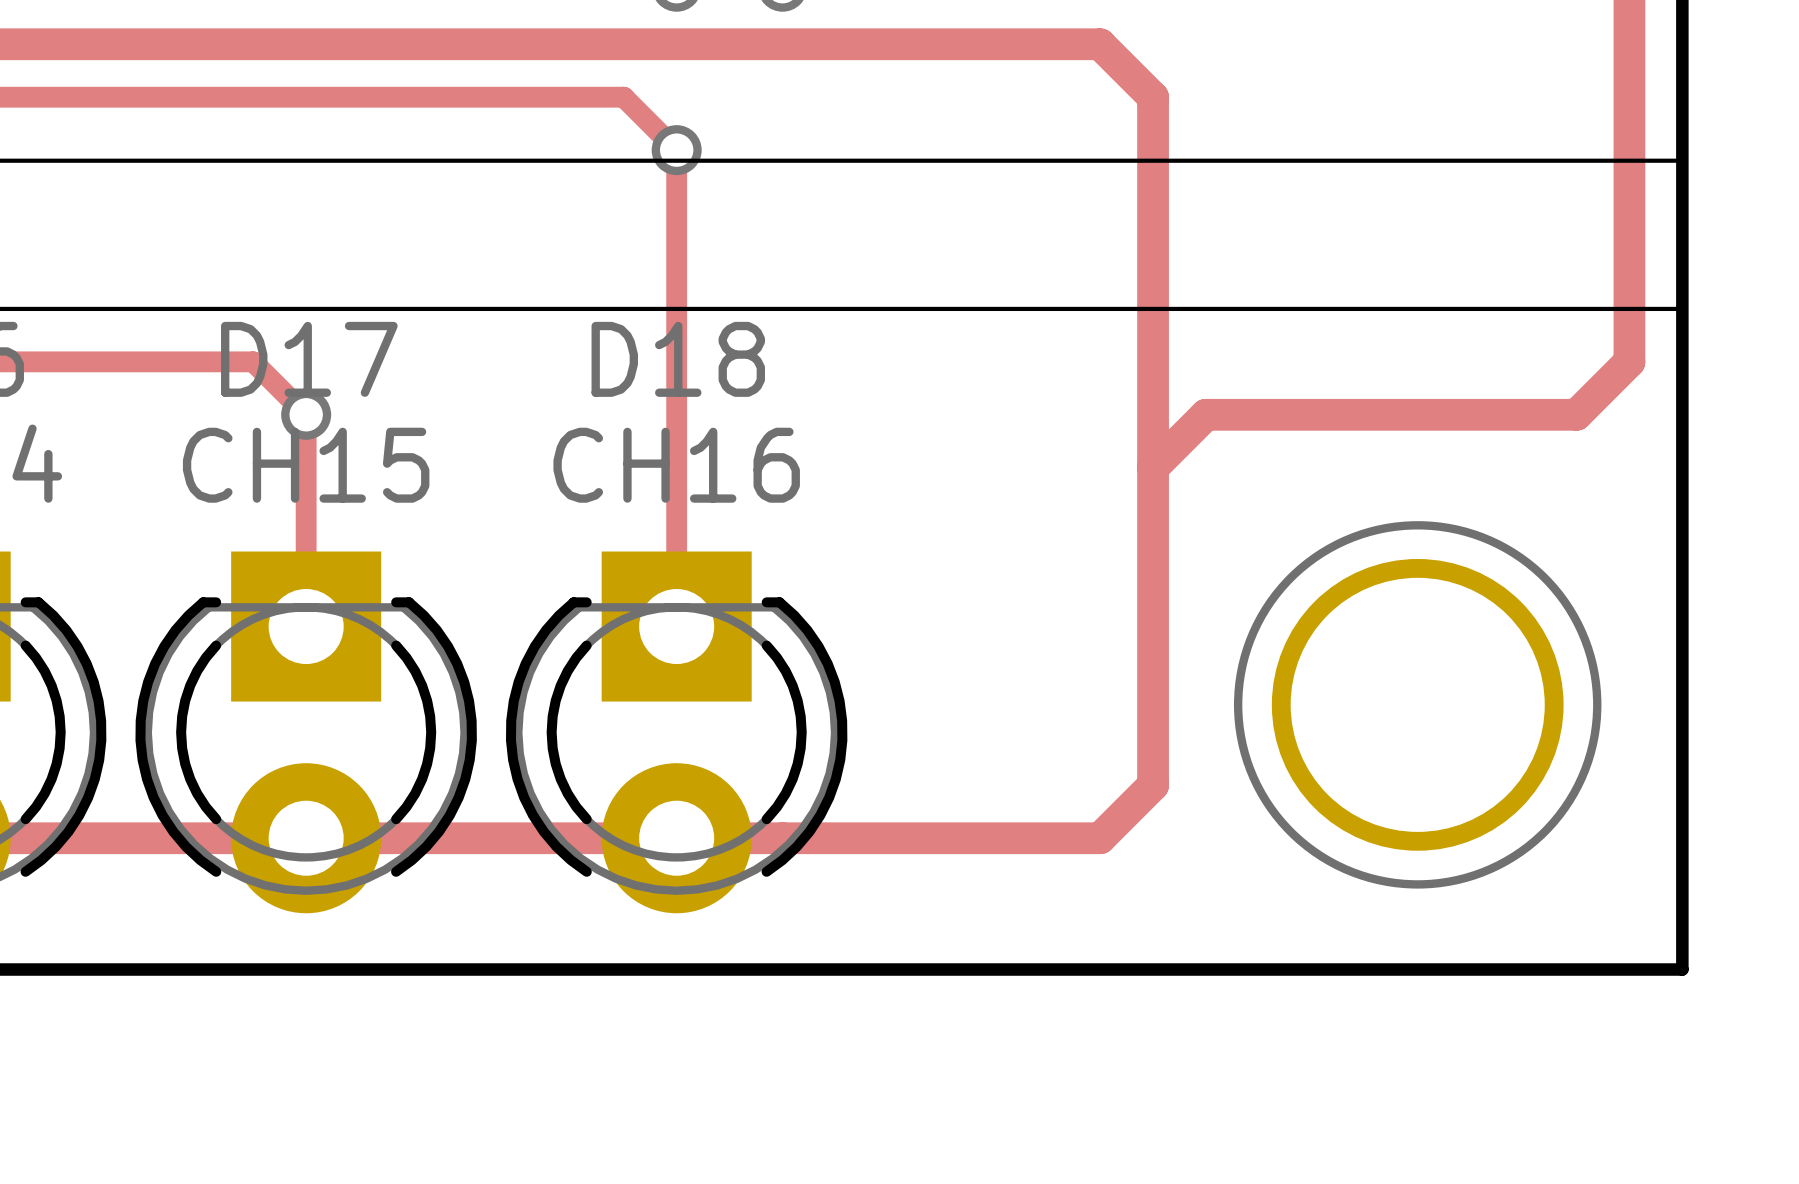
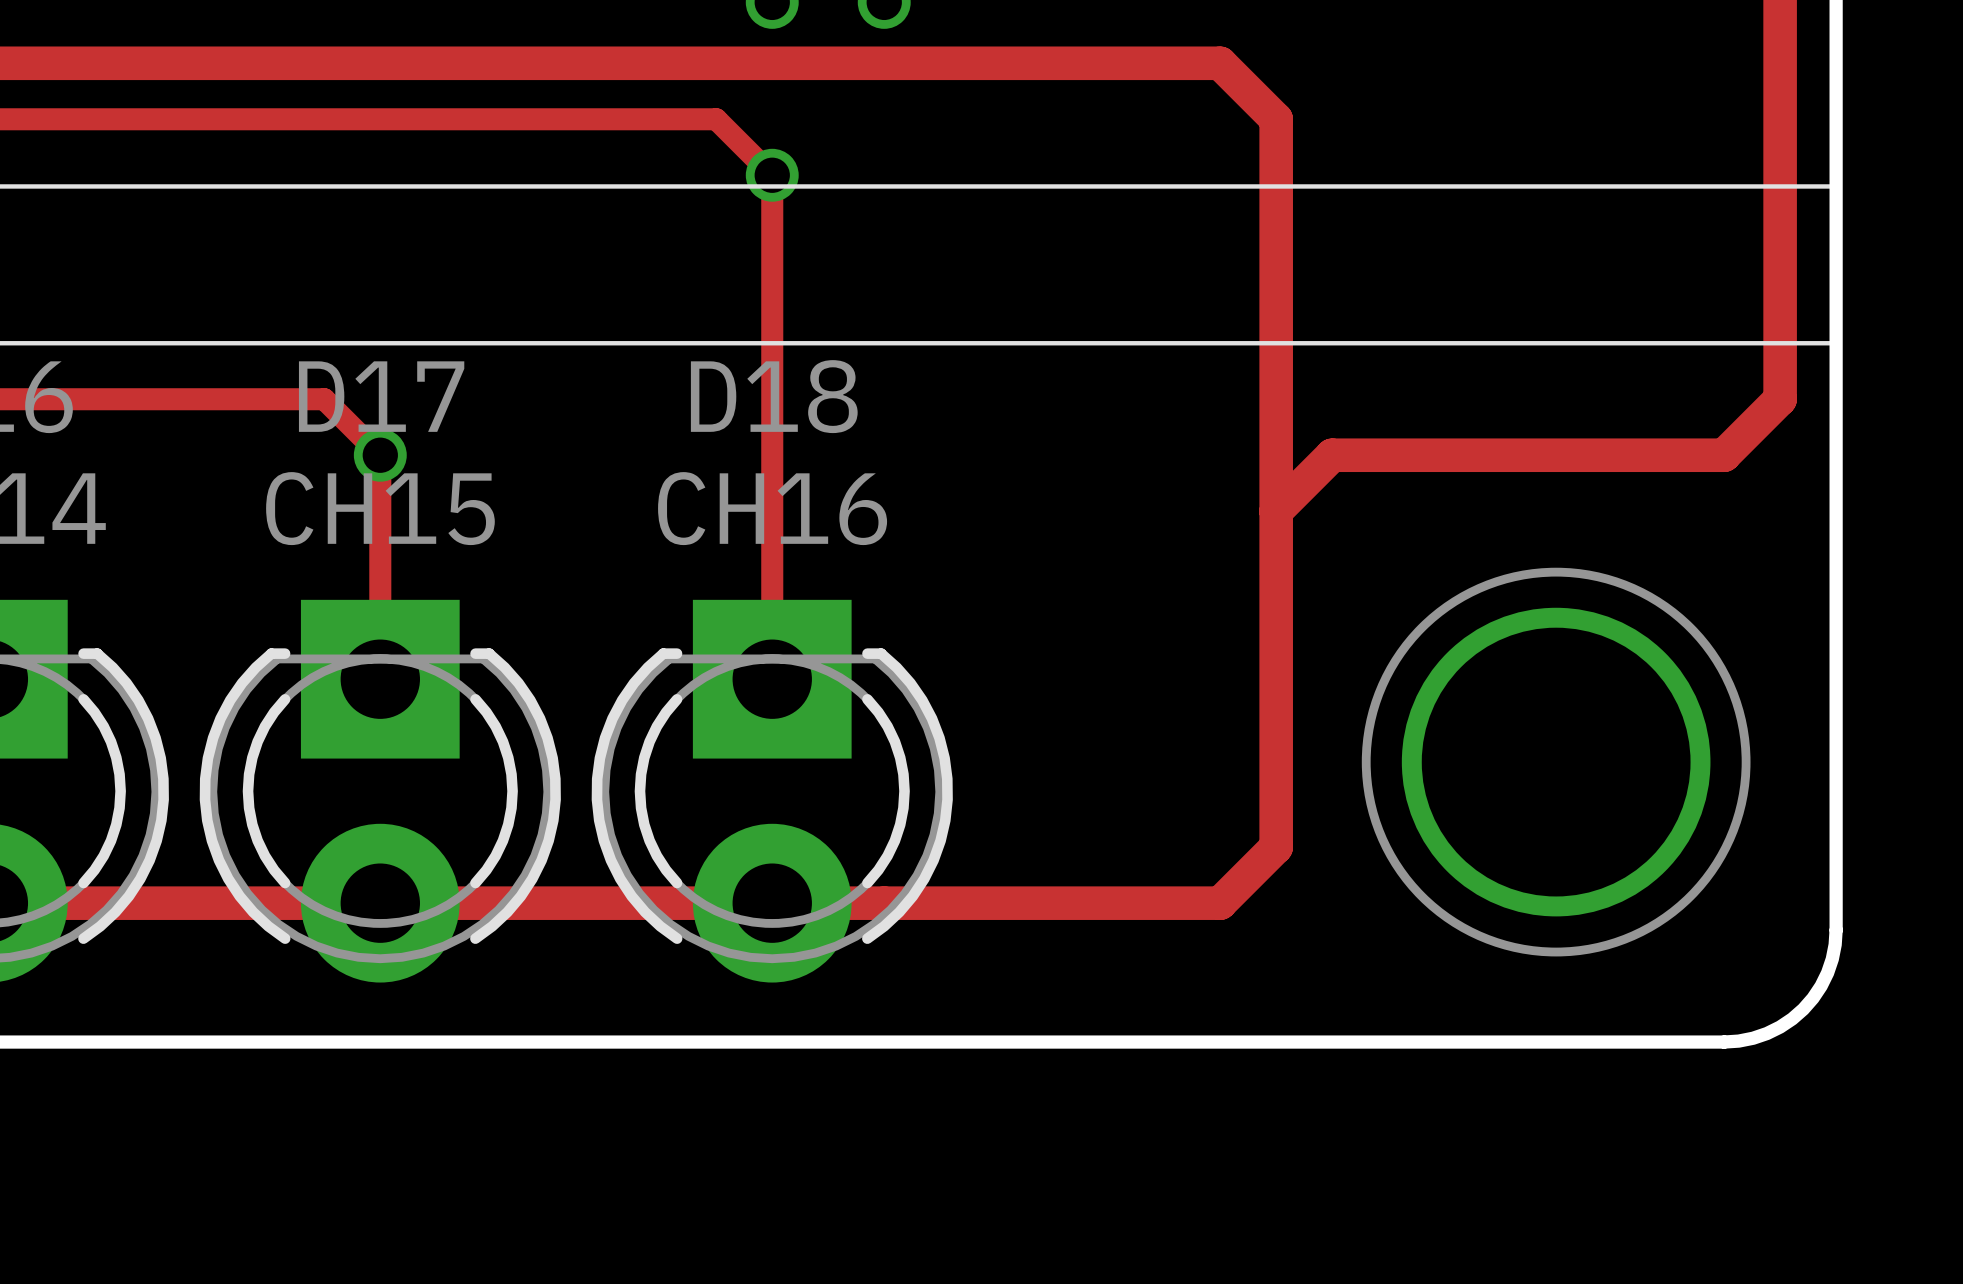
board edge: (1682, 863) (1682, 969) (1576, 969) -> (1836, 930) (1832, 959) (1827, 972) (1812, 998) (1803, 1009) (1780, 1027) (1766, 1033) (1753, 1038) (1724, 1042)

